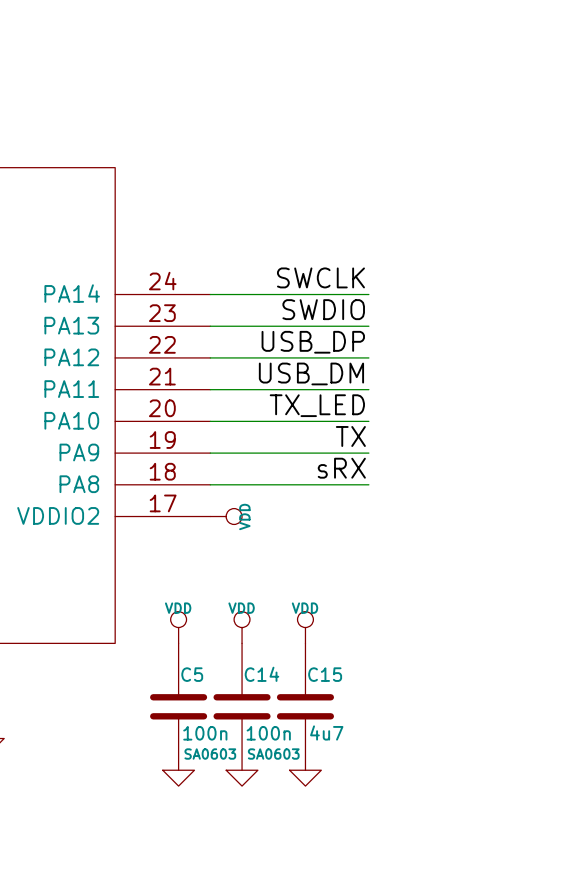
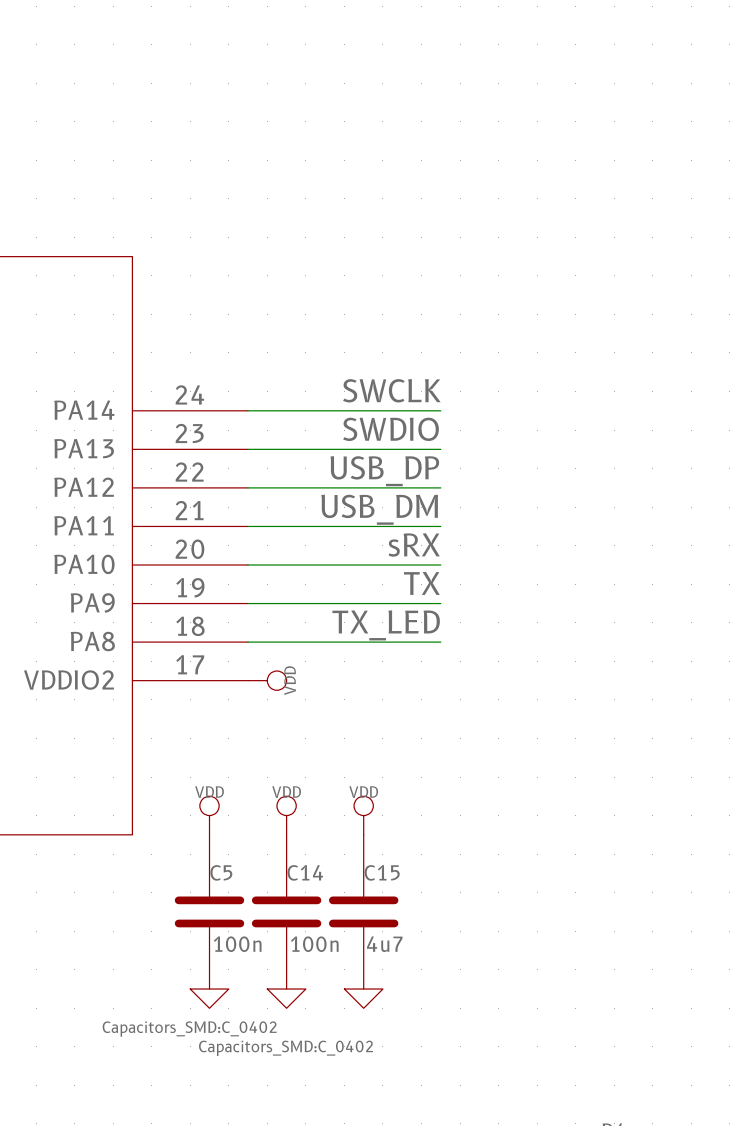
label: TX_LED (317, 405) -> sRX (414, 544)
label: sRX (341, 468) -> TX_LED (386, 625)
C5 text: SA0603 (210, 754) -> Capacitors_SMD:C_0402 (189, 1029)
C14 text: SA0603 (273, 754) -> Capacitors_SMD:C_0402 (286, 1048)

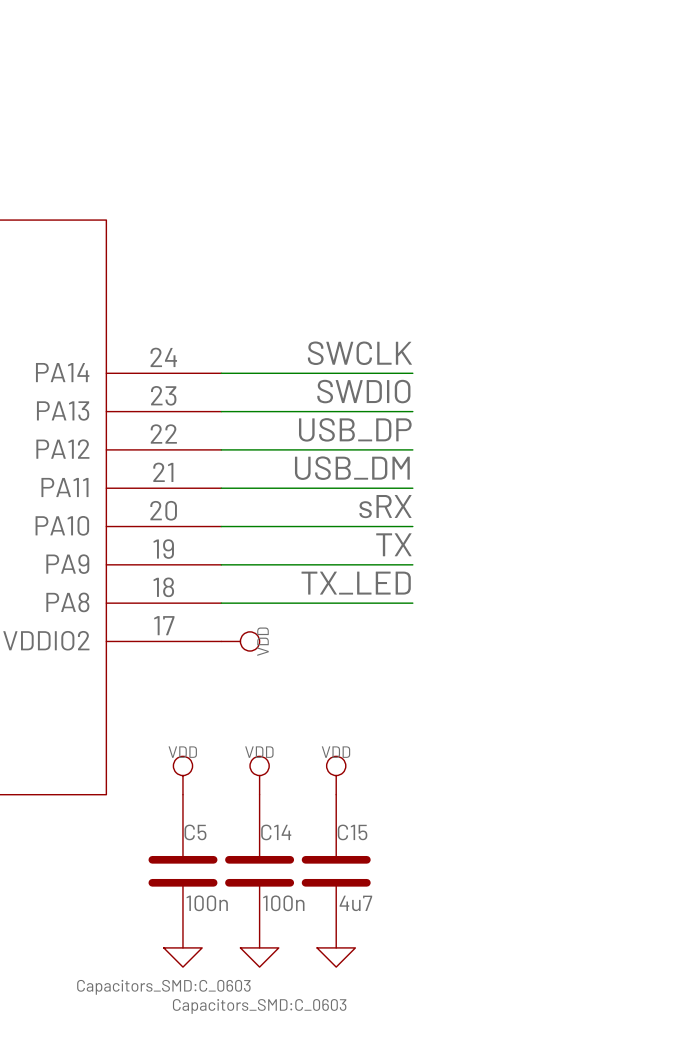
C5 text: Capacitors_SMD:C_0402 (189, 1029) -> Capacitors_SMD:C_0603 (163, 987)
C14 text: Capacitors_SMD:C_0402 (286, 1048) -> Capacitors_SMD:C_0603 (259, 1006)

